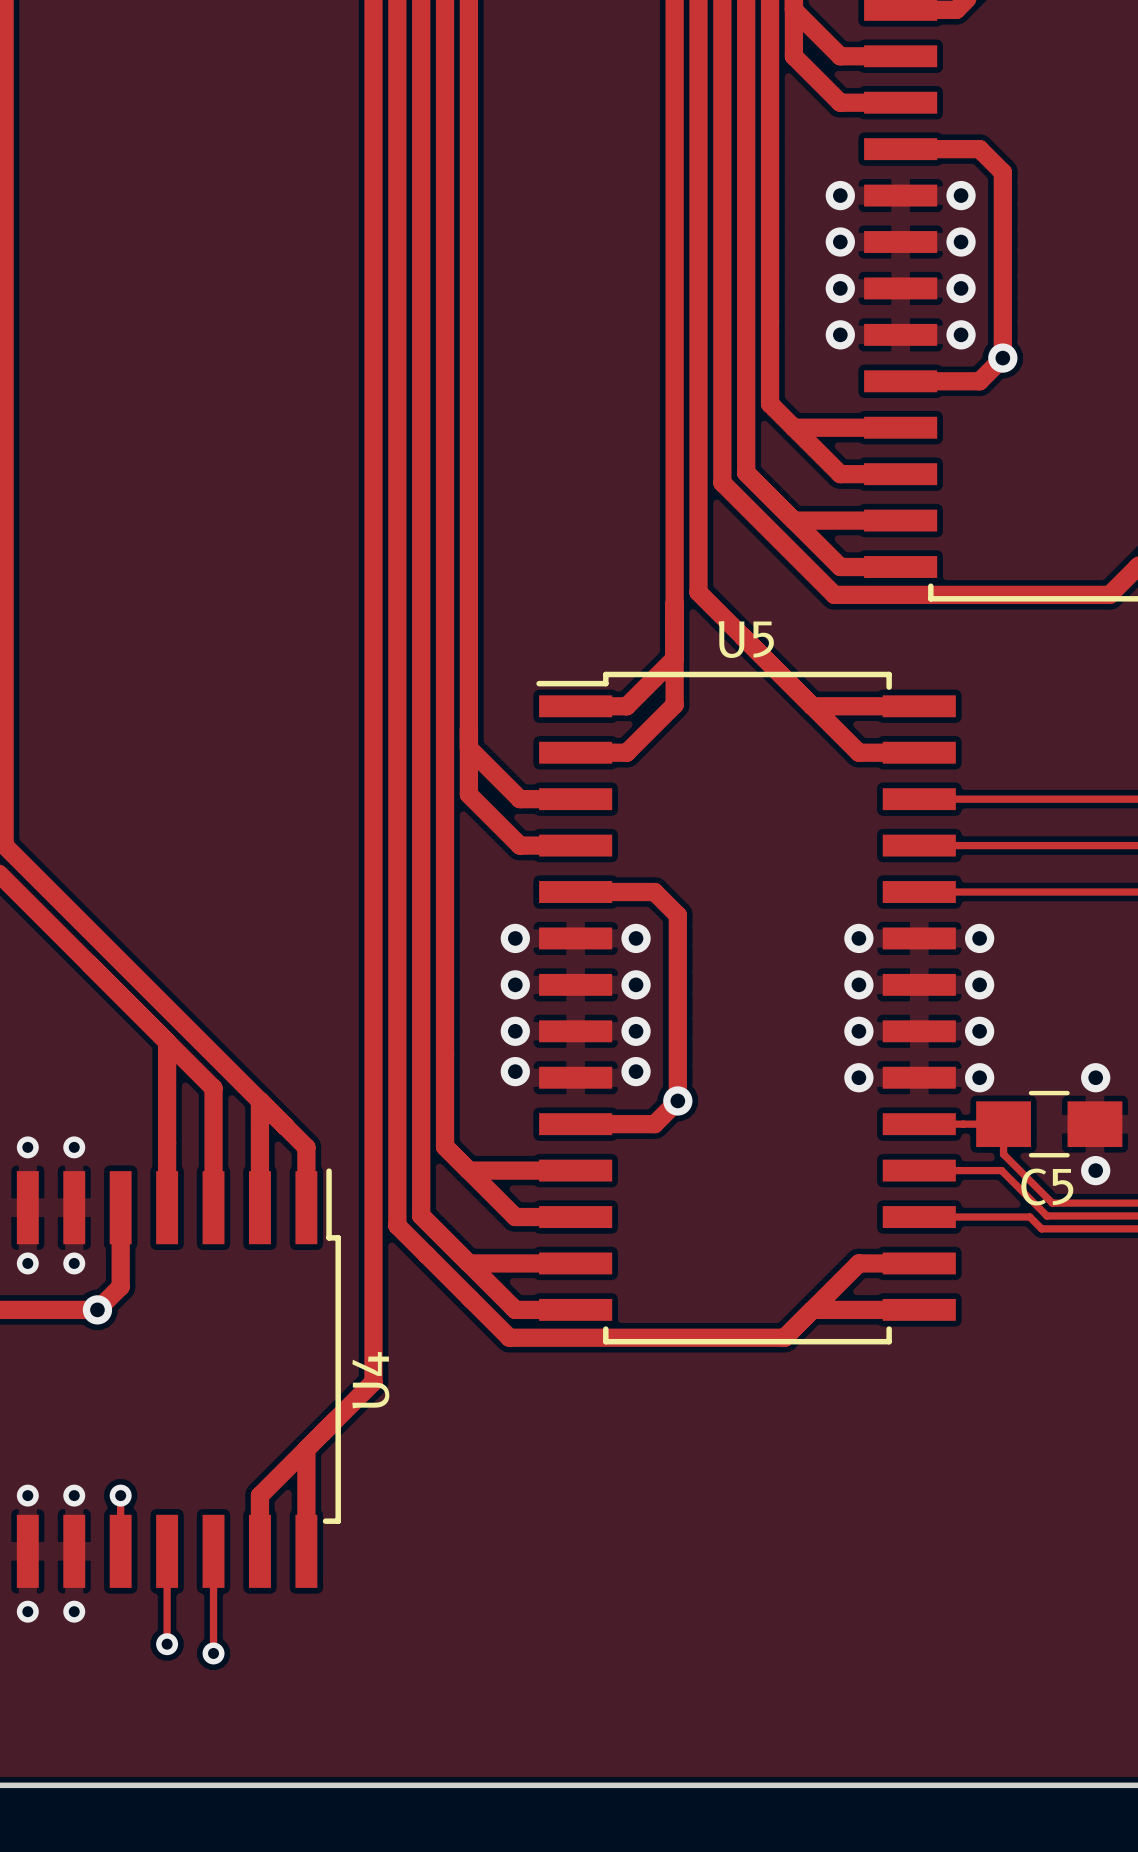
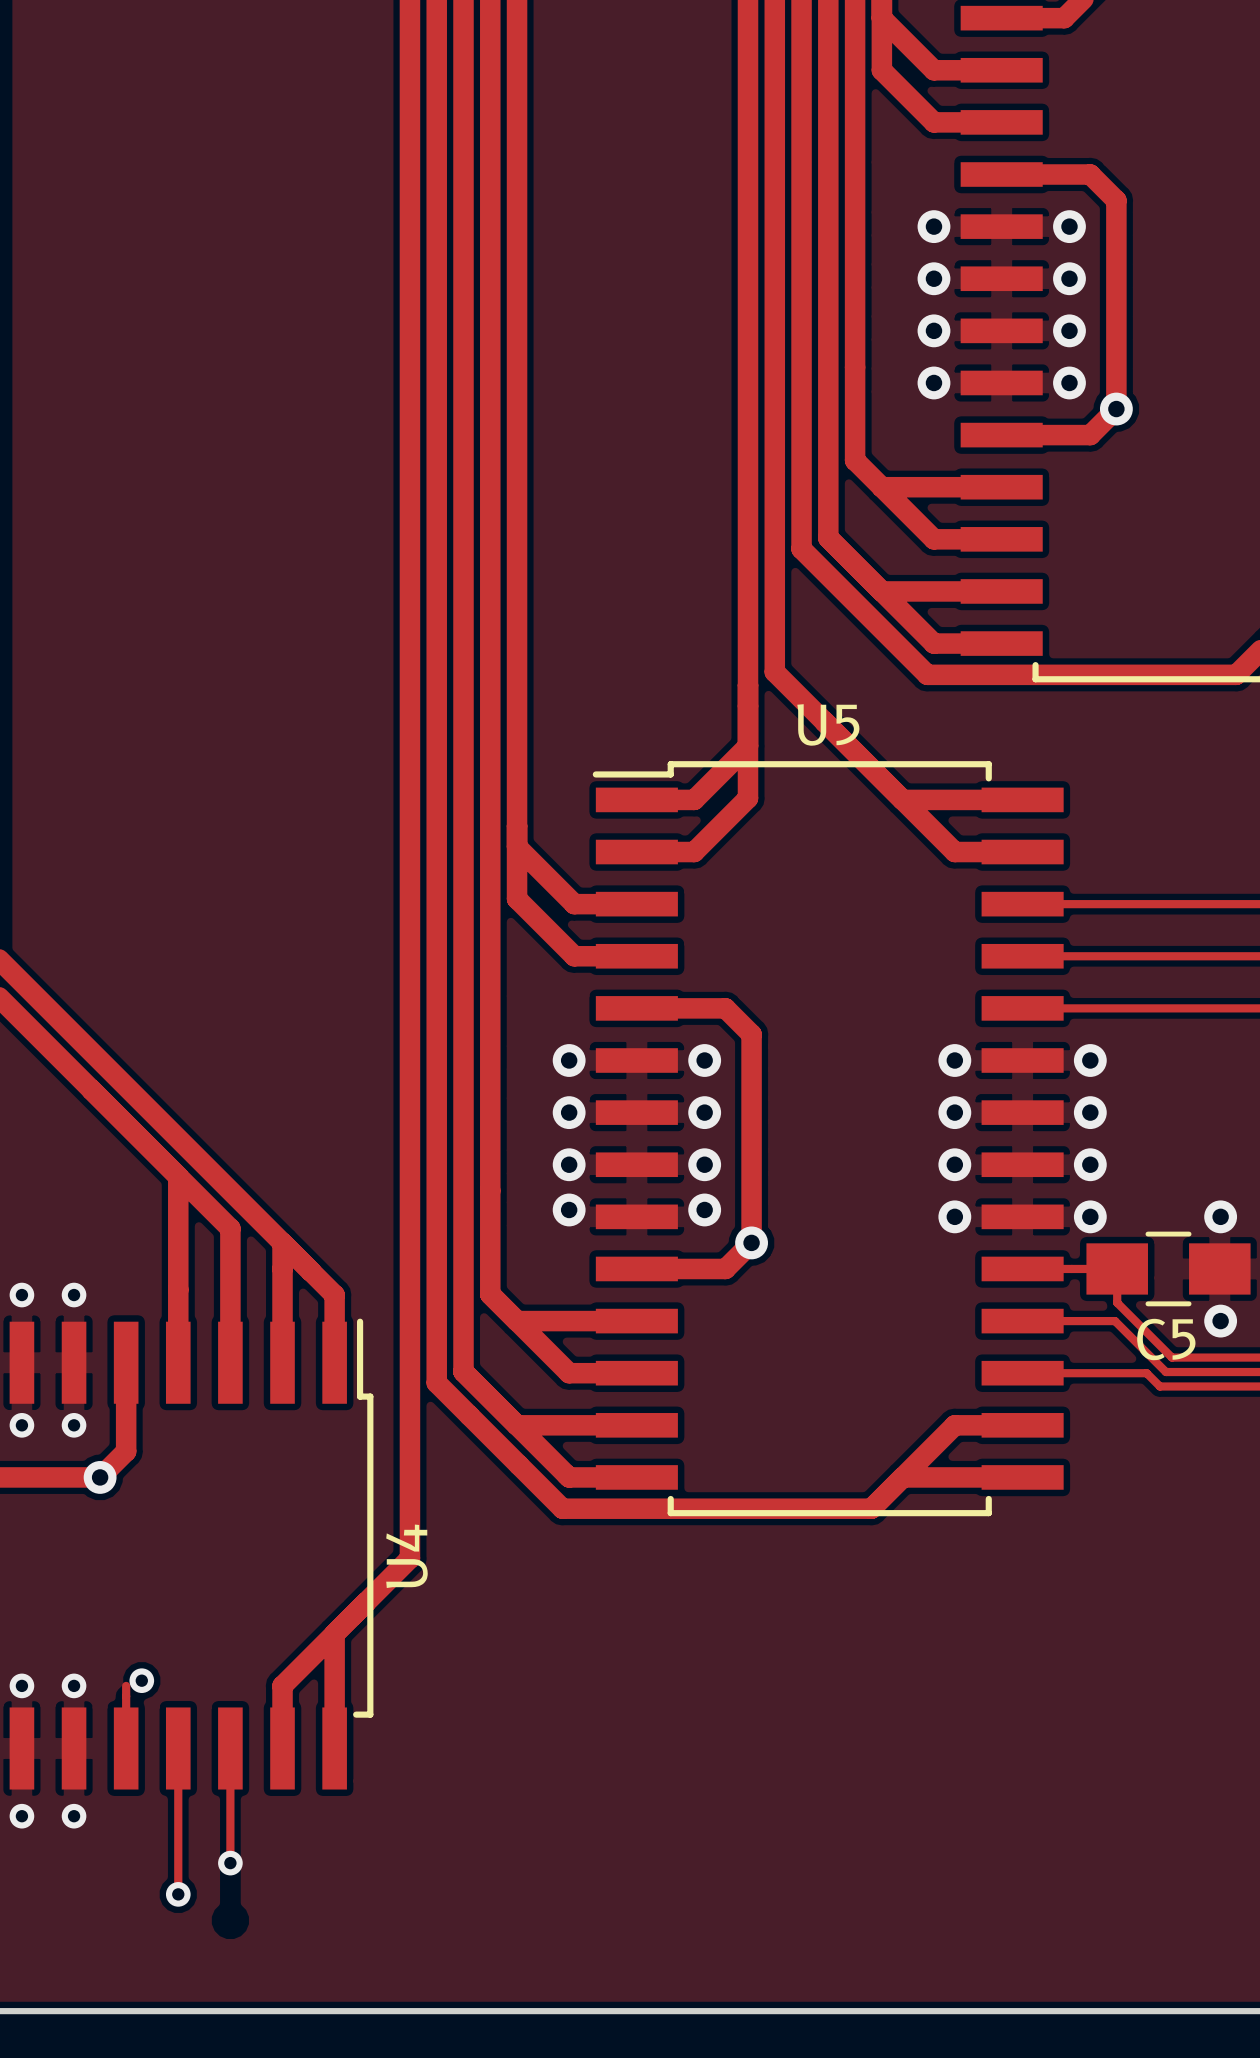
via position: (120, 1495) -> (141, 1680)
track: none -> (178, 1852) (178, 1894)
via position: (167, 1644) -> (178, 1894)

